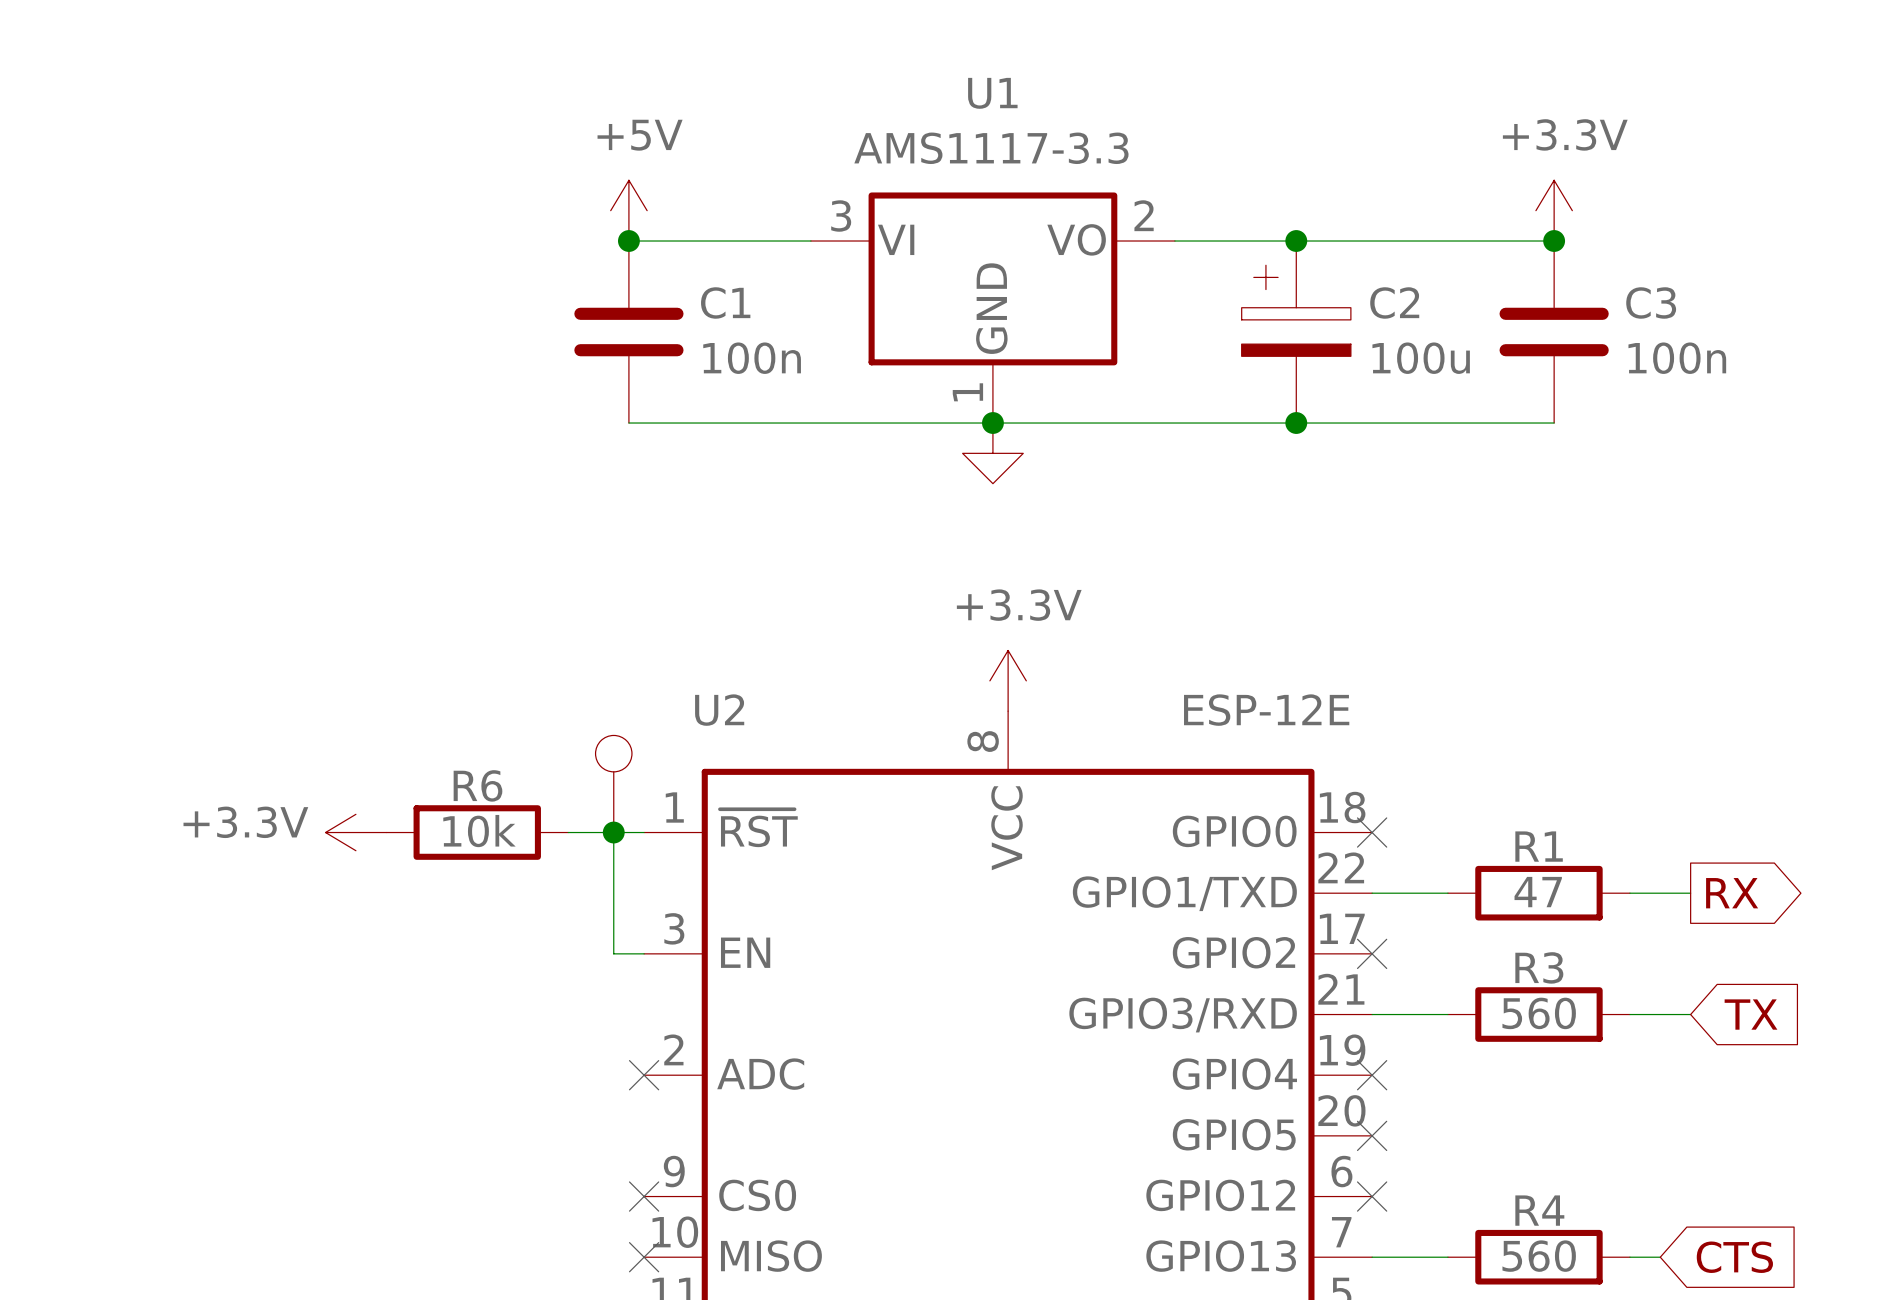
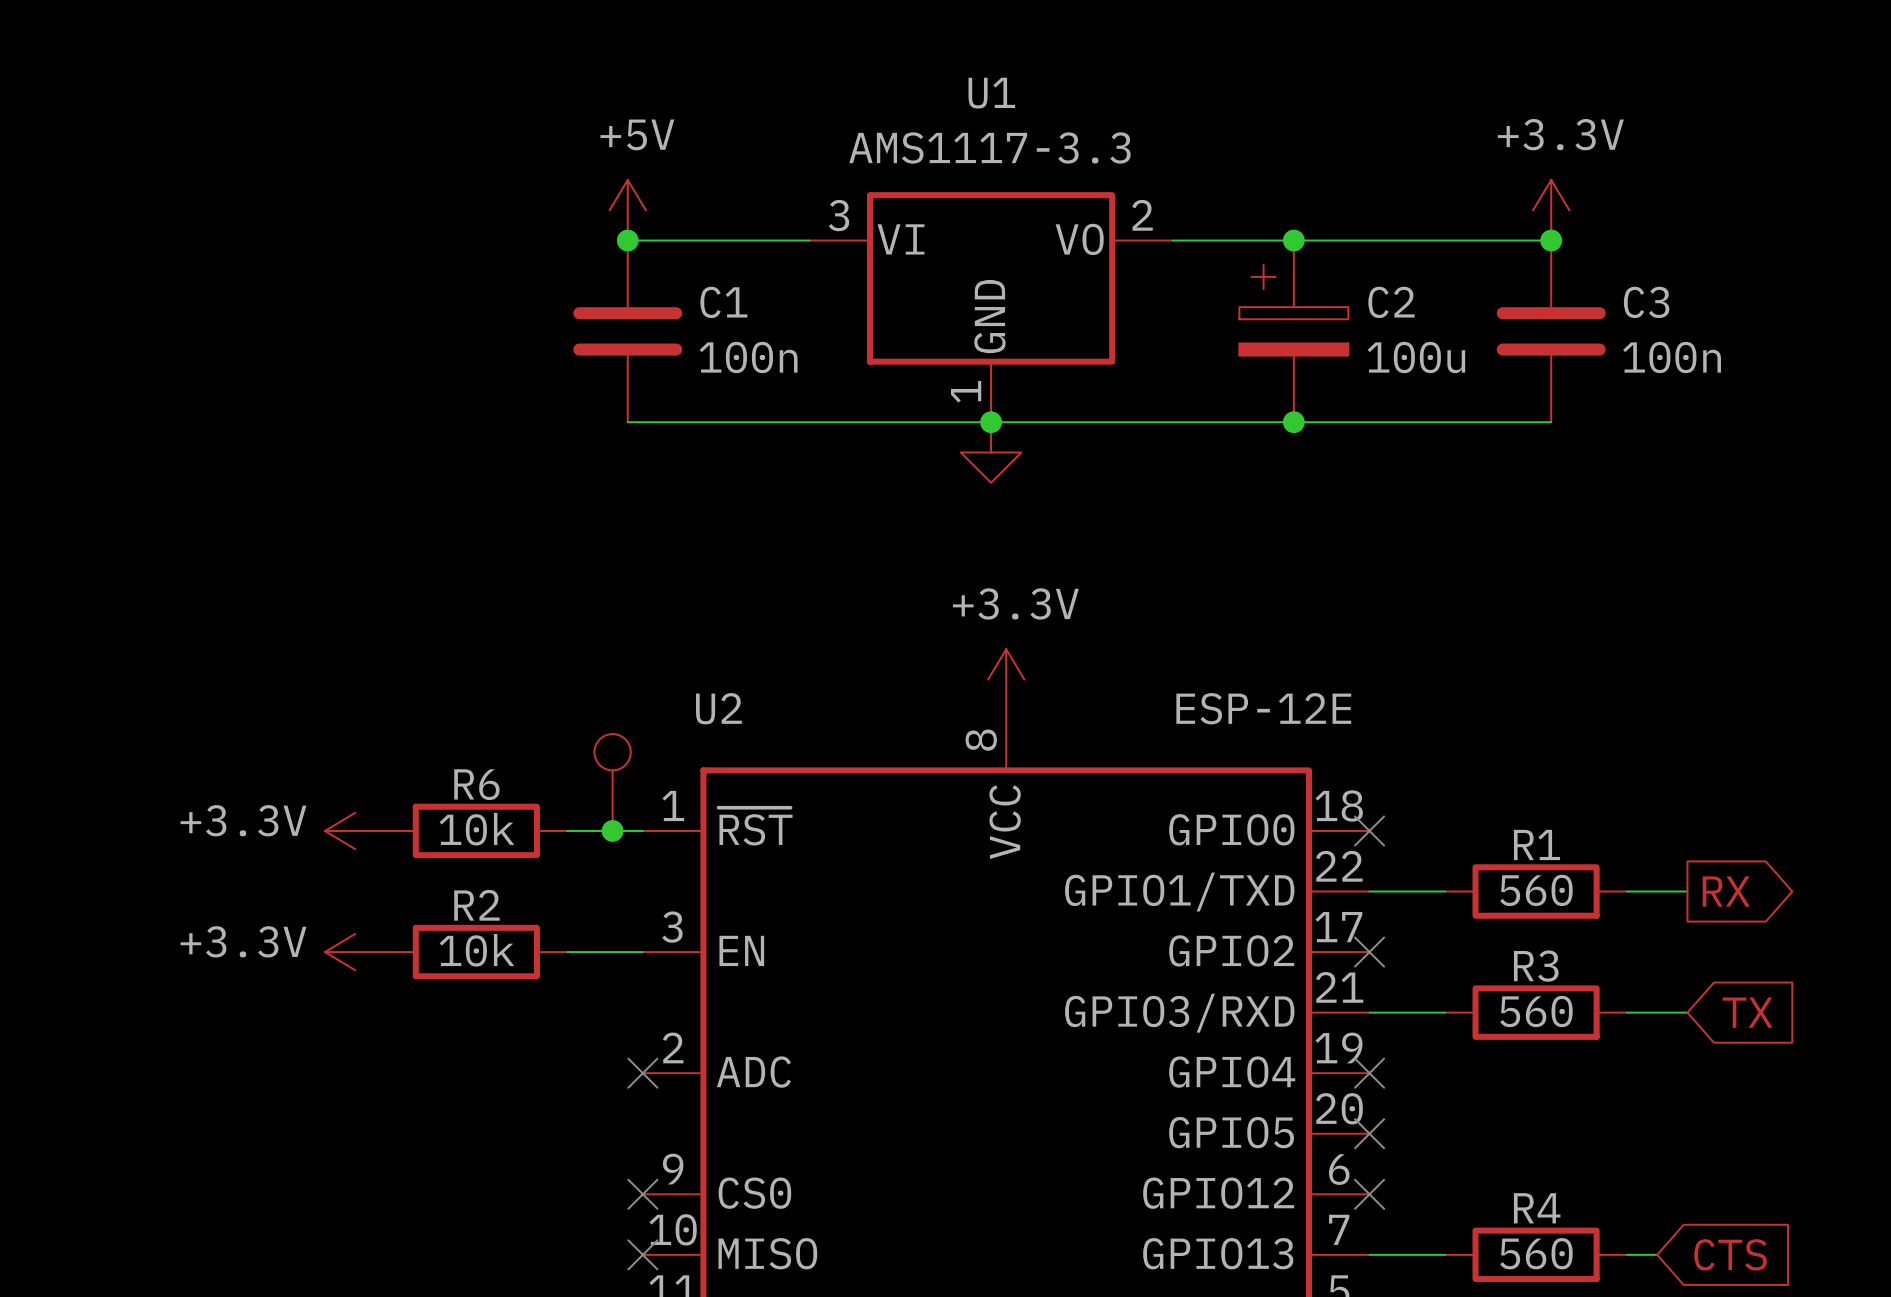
wire: (613, 832) (613, 953) -> (567, 952) (612, 952)
R1 value: 47 (1538, 892) -> 560 (1536, 890)
power symbol: none -> +3.3V (355, 952)
R2: none -> 10k (476, 952)

